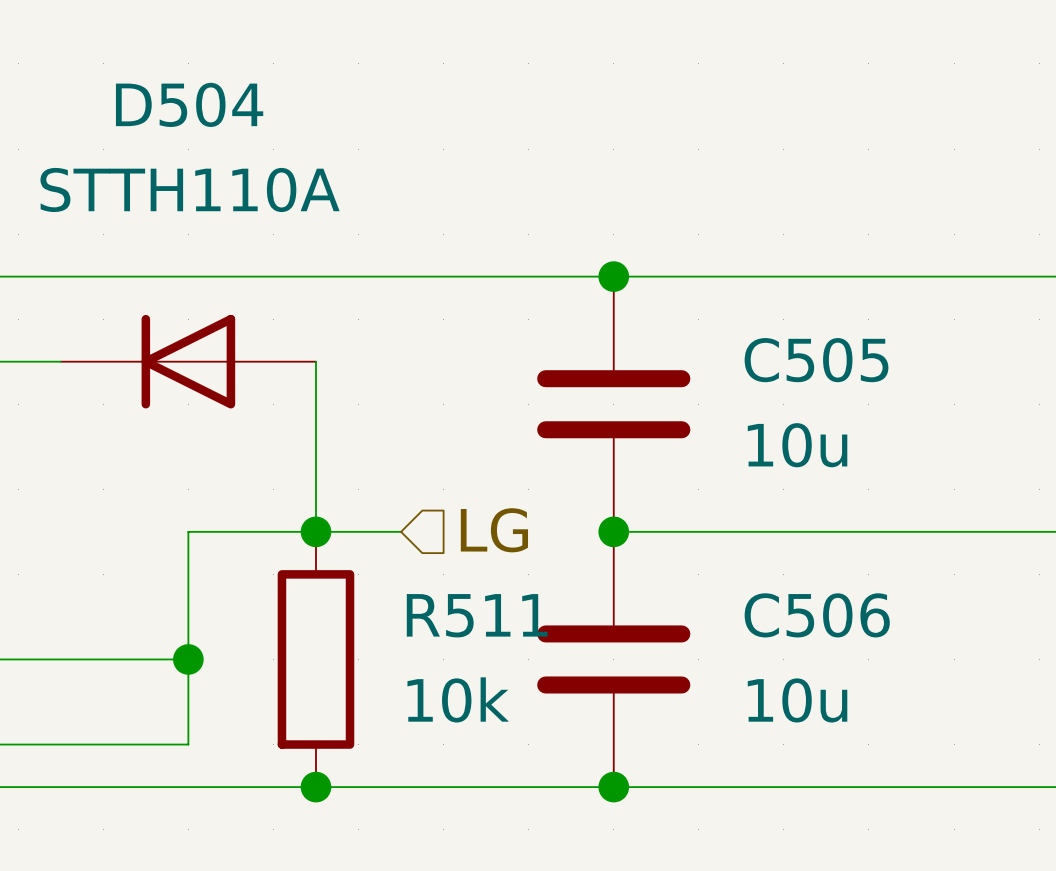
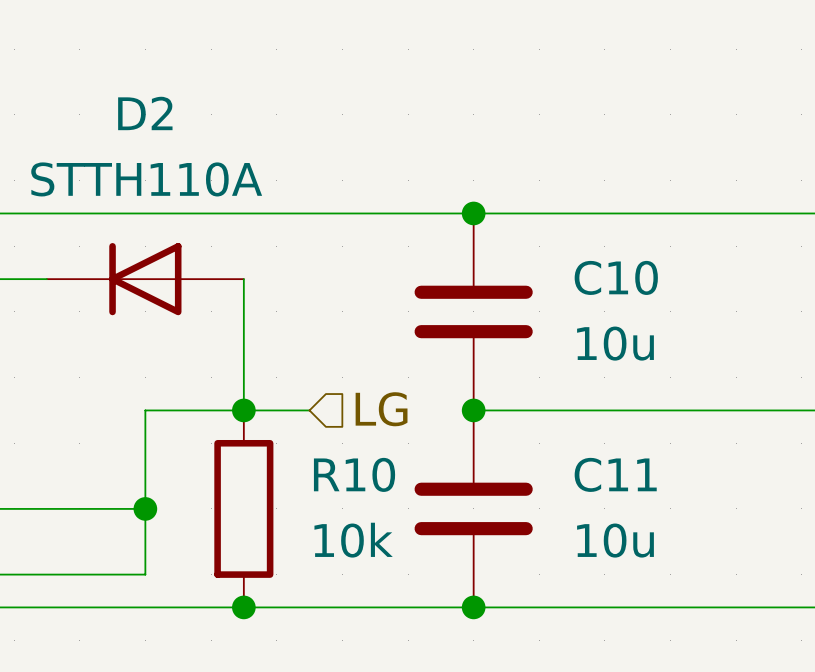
D504 name: D504 (189, 104) -> D2 (145, 113)
D504 value position: STTH110A (190, 189) -> STTH110A (146, 179)
C505 name: C505 (816, 360) -> C10 (616, 277)
R511 name: R511 (477, 615) -> R10 (354, 474)
C506 name: C506 (817, 615) -> C11 (615, 474)

